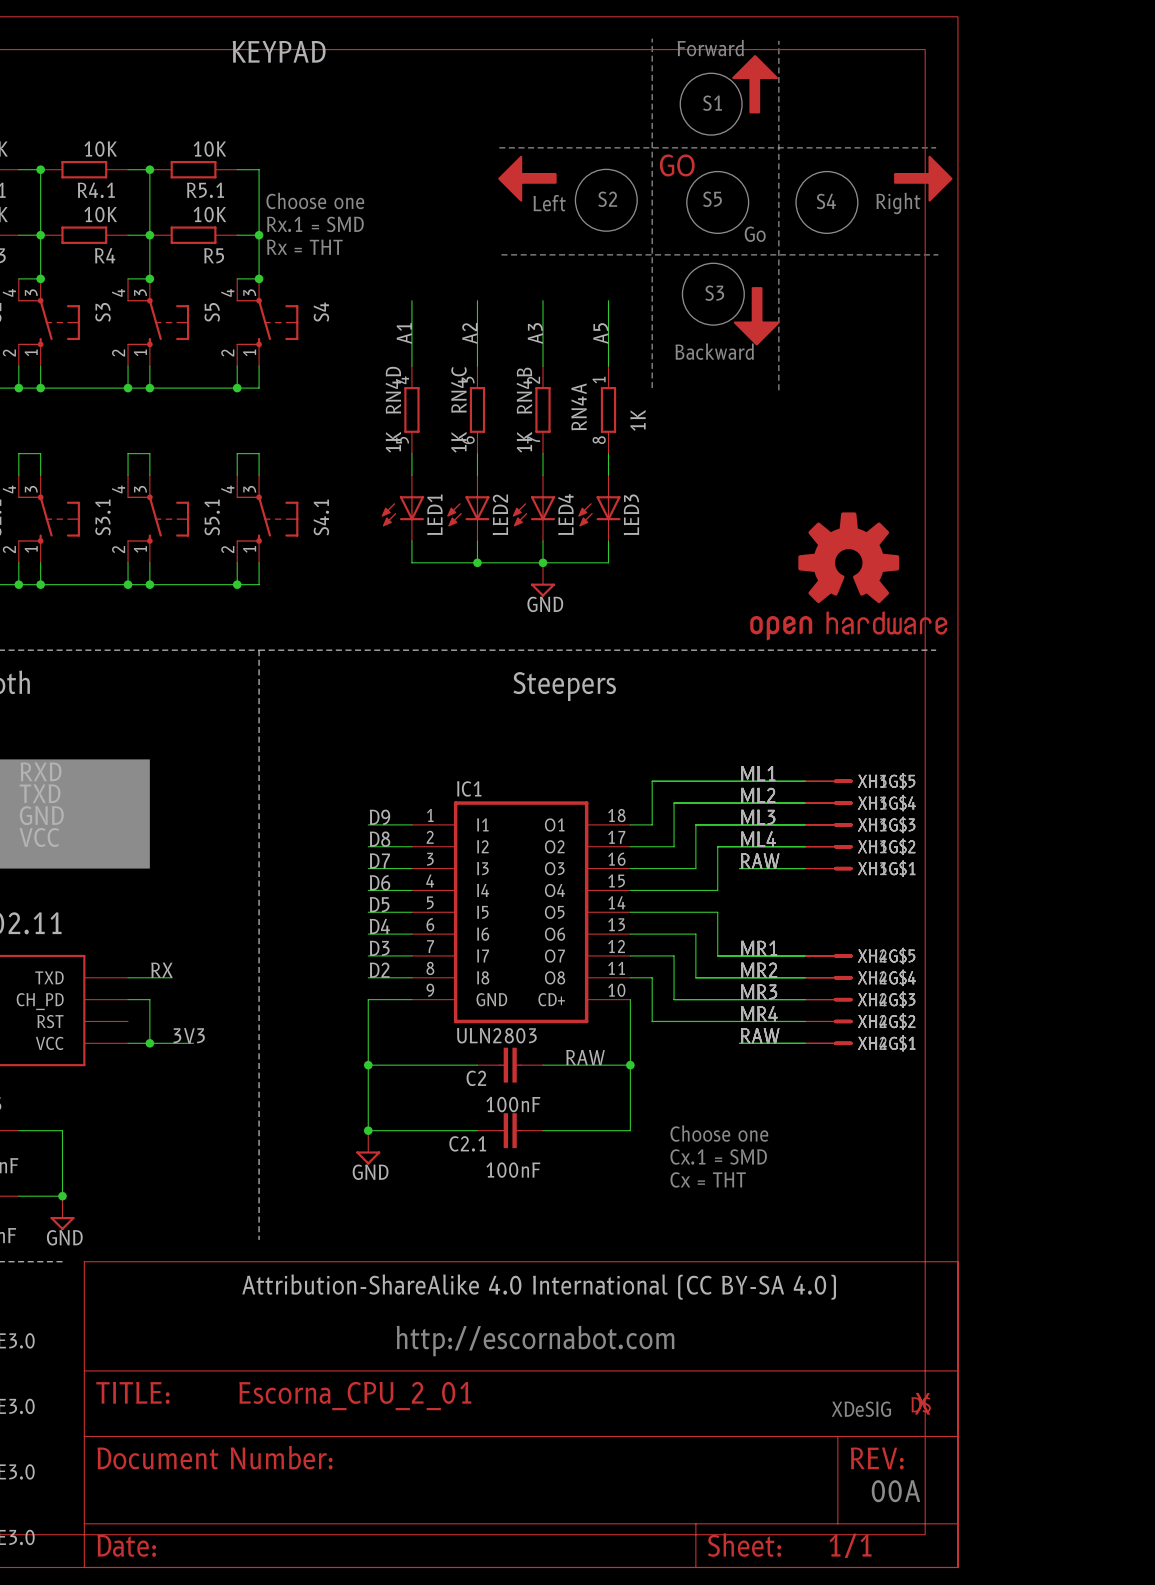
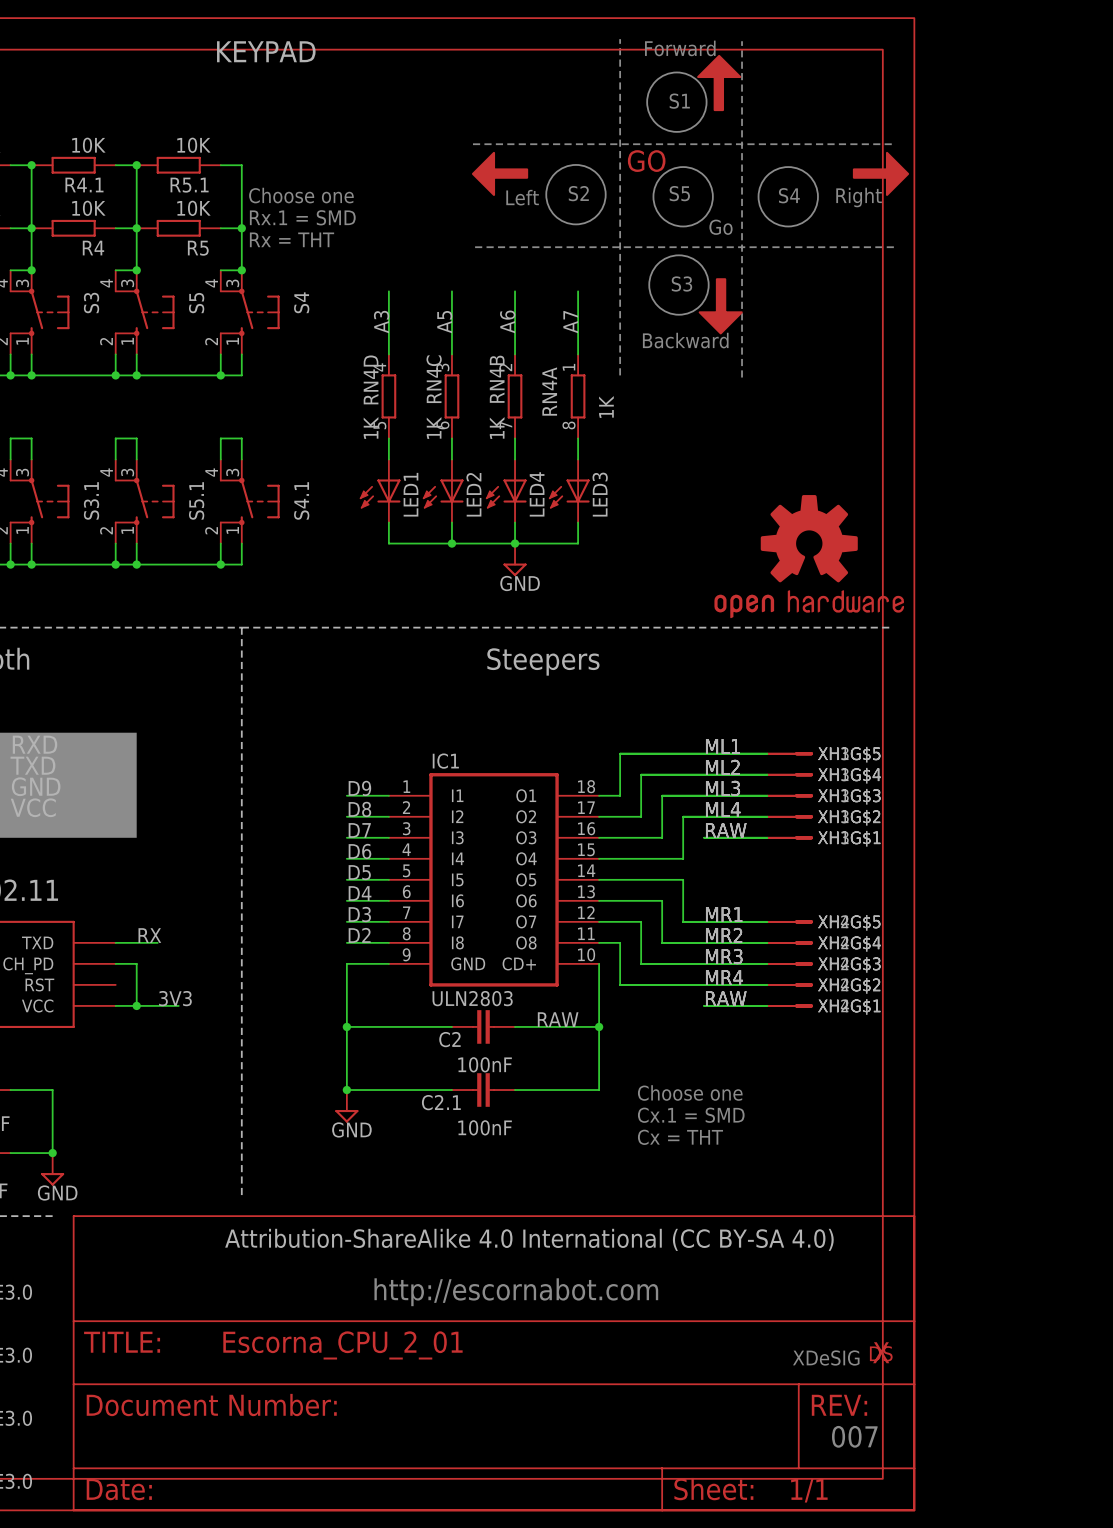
label: A1 (404, 333) -> A3 (381, 322)
label: A2 (469, 333) -> A5 (444, 322)
label: A3 (535, 333) -> A6 (507, 321)
label: A5 (600, 333) -> A7 (570, 322)
text: 00A (895, 1491) -> 007 (854, 1436)

